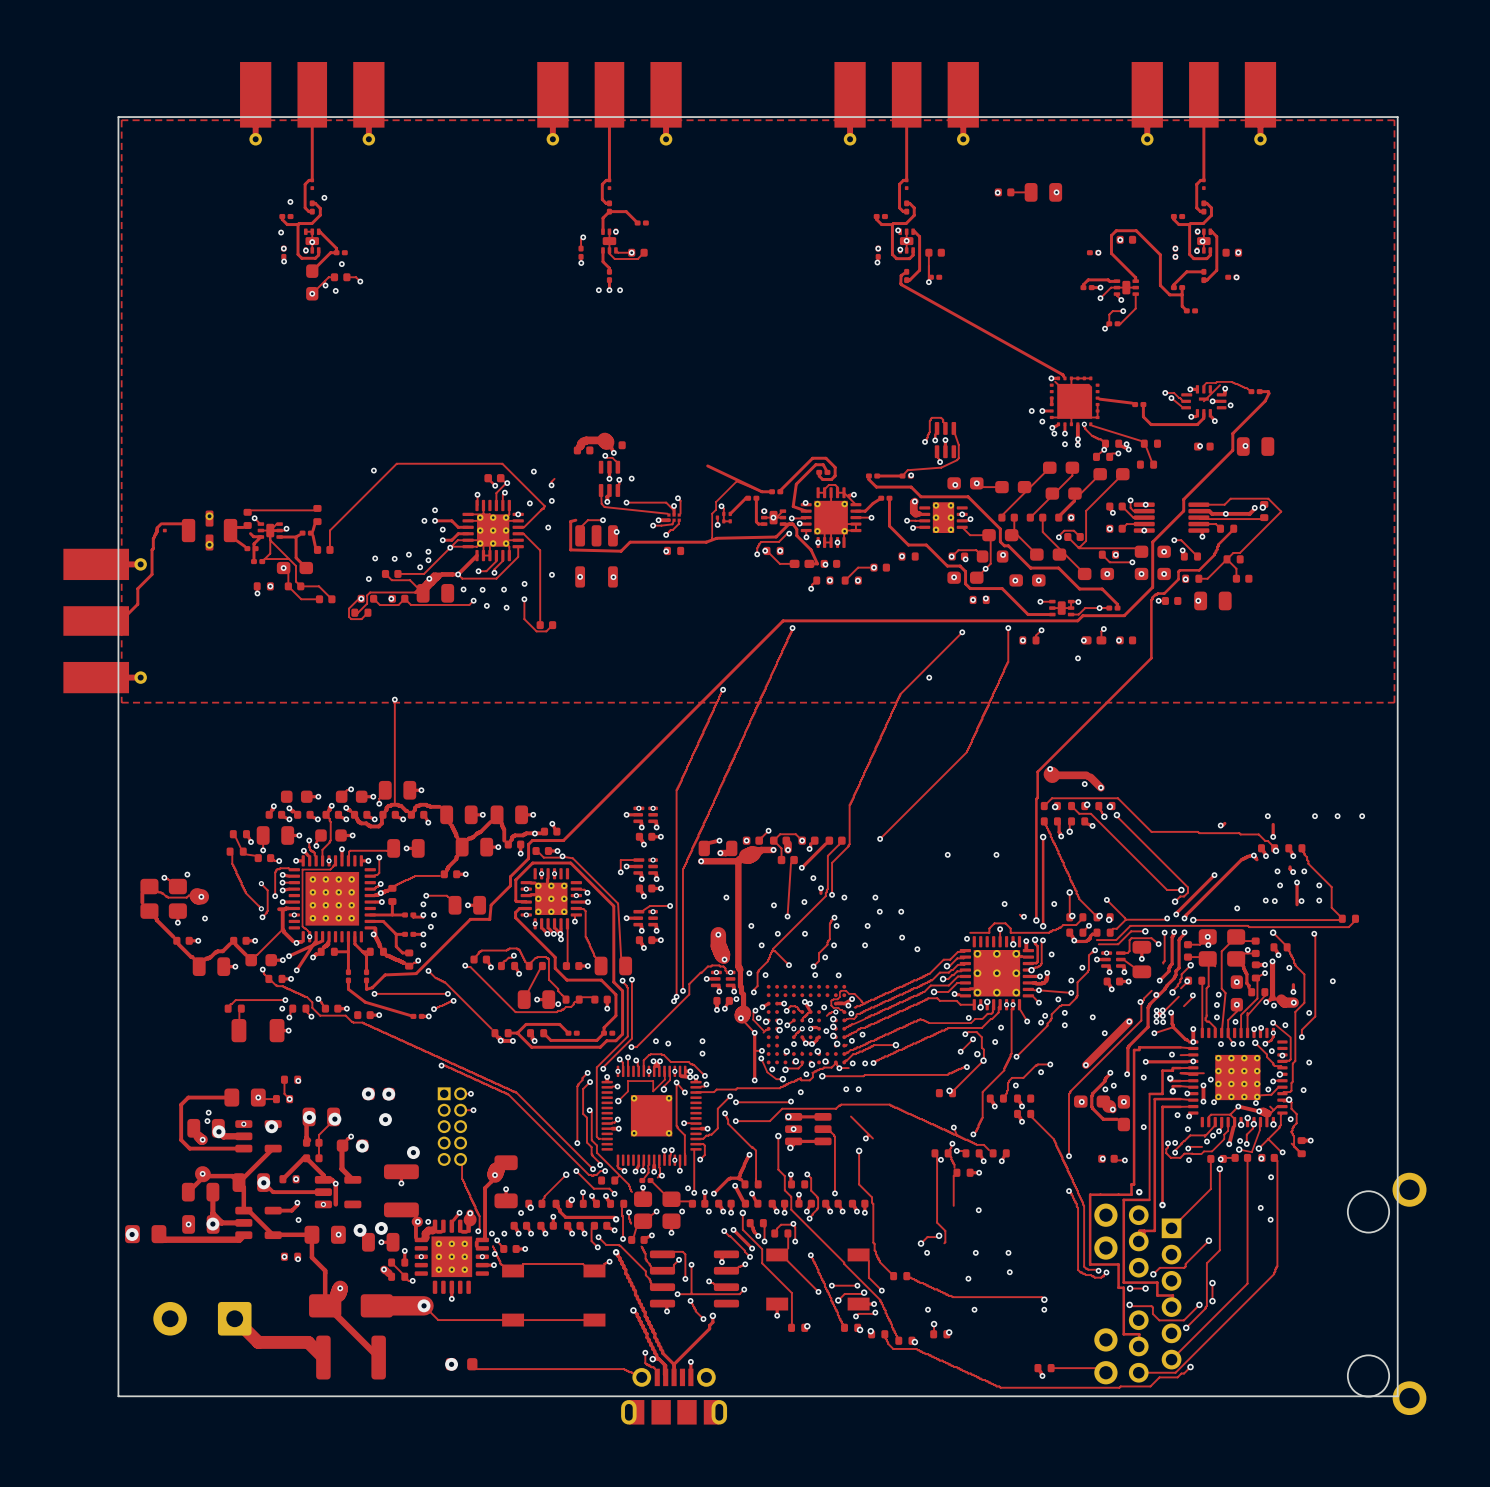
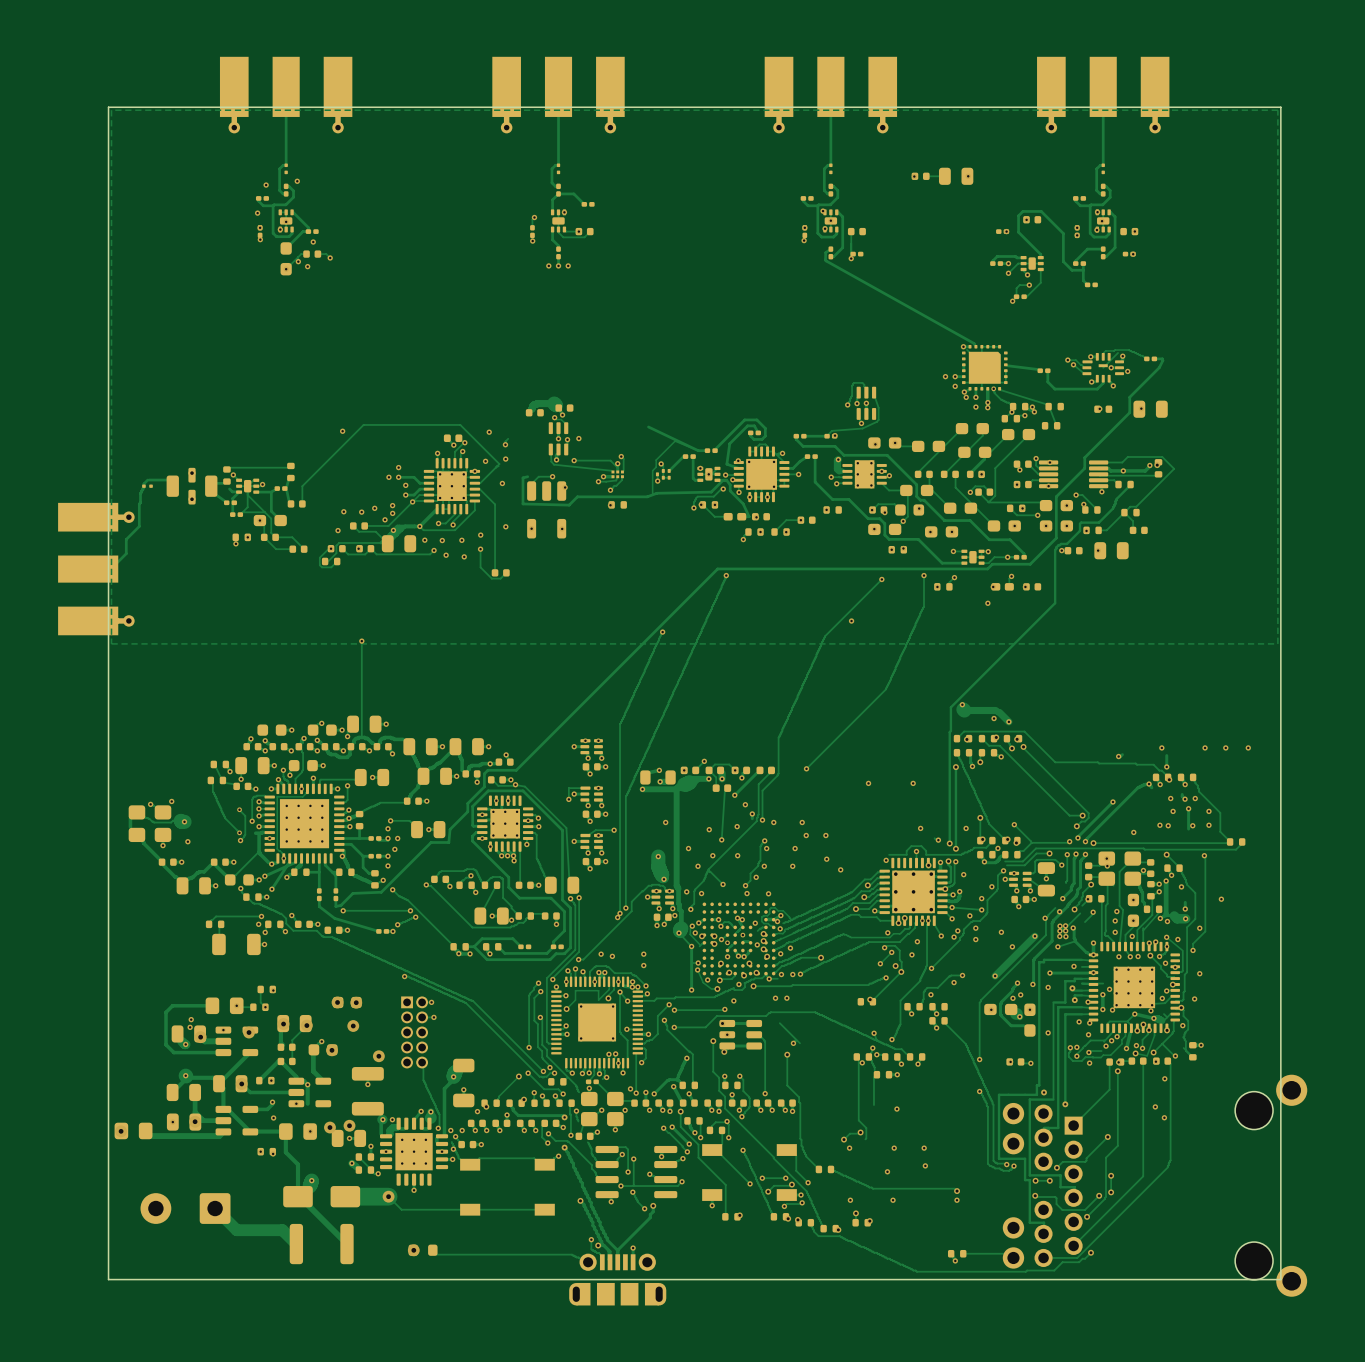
via: (835, 1012) -> none
via: (802, 1028) -> none
via: (810, 1028) -> none

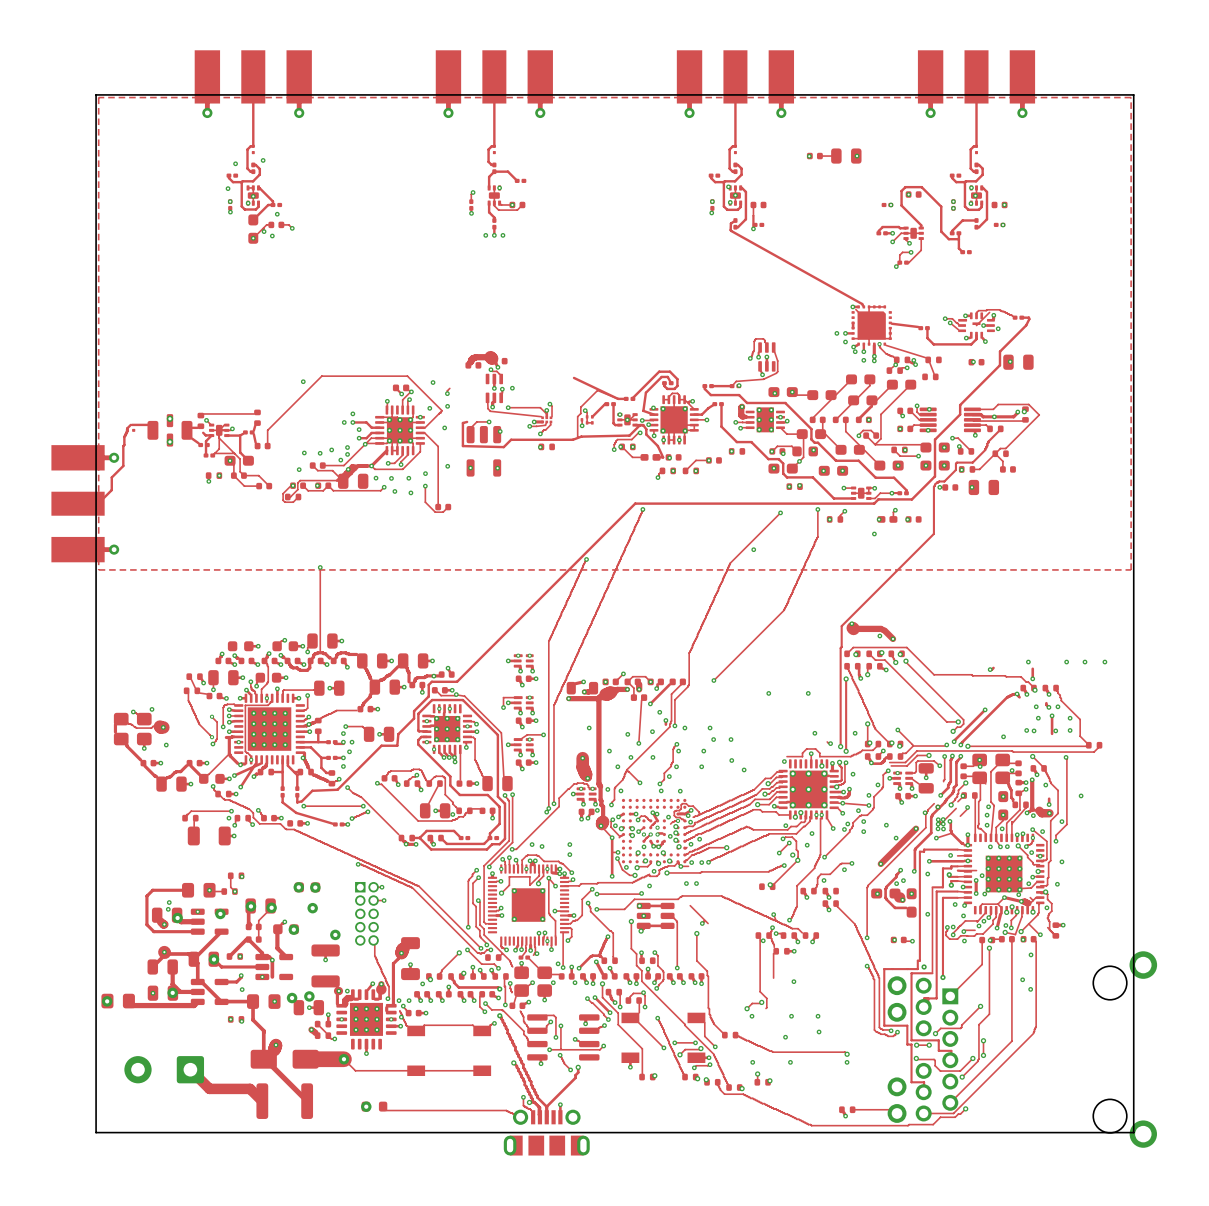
via: none -> (677, 820)
via: none -> (650, 834)
via: none -> (657, 834)

